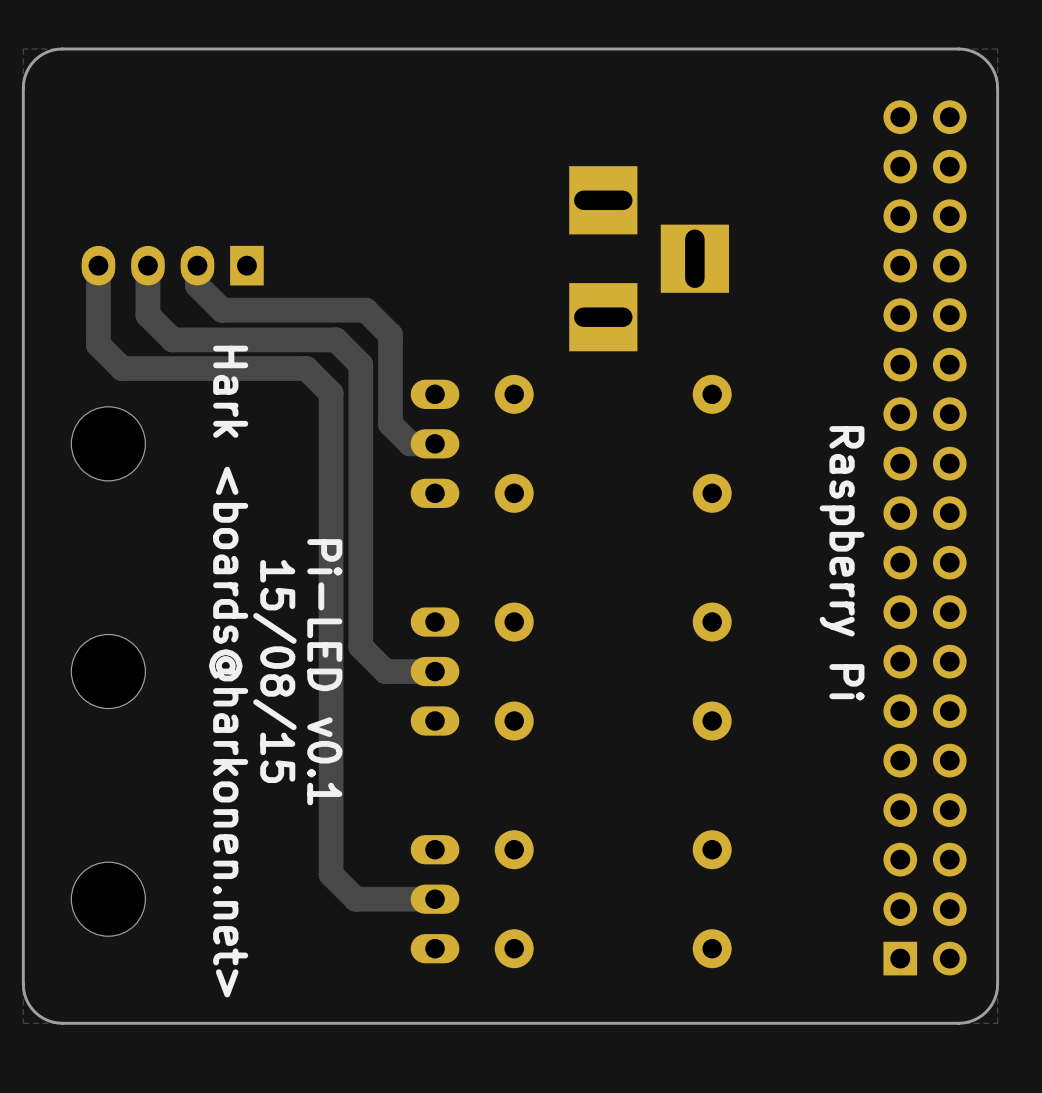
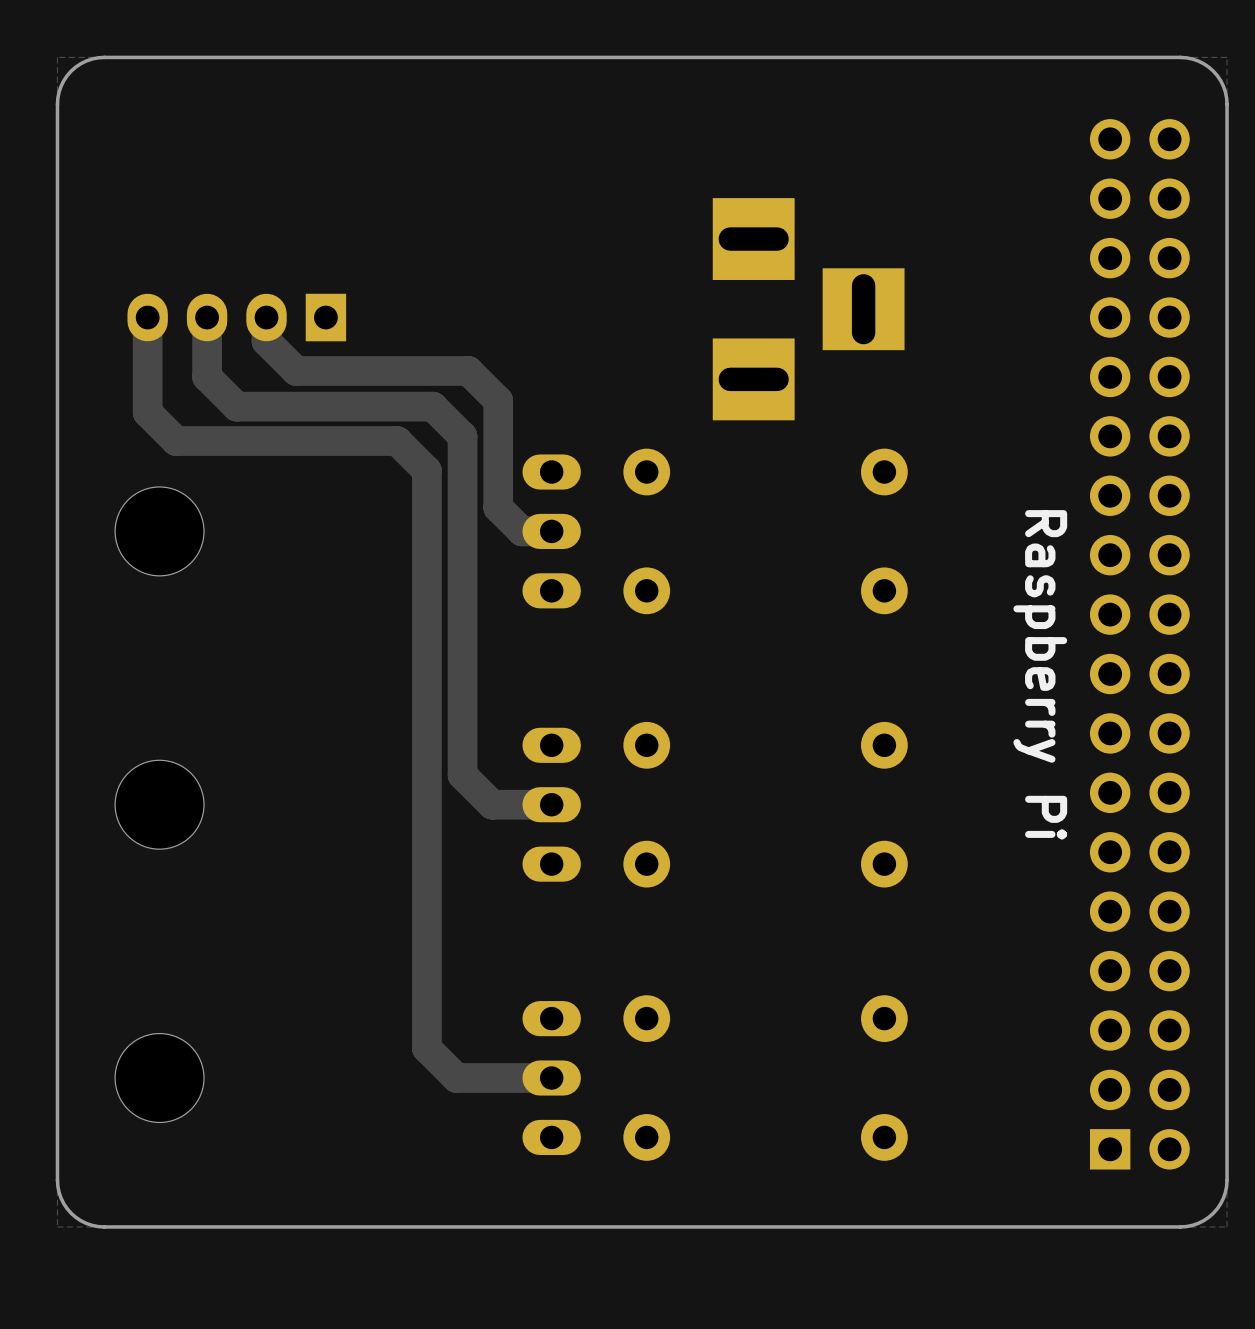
text: Hark <boards@harkonen.net> (228, 671) -> none
text: 15/08/15 (274, 671) -> none
text: Pi-LED v0.1 (324, 672) -> none

